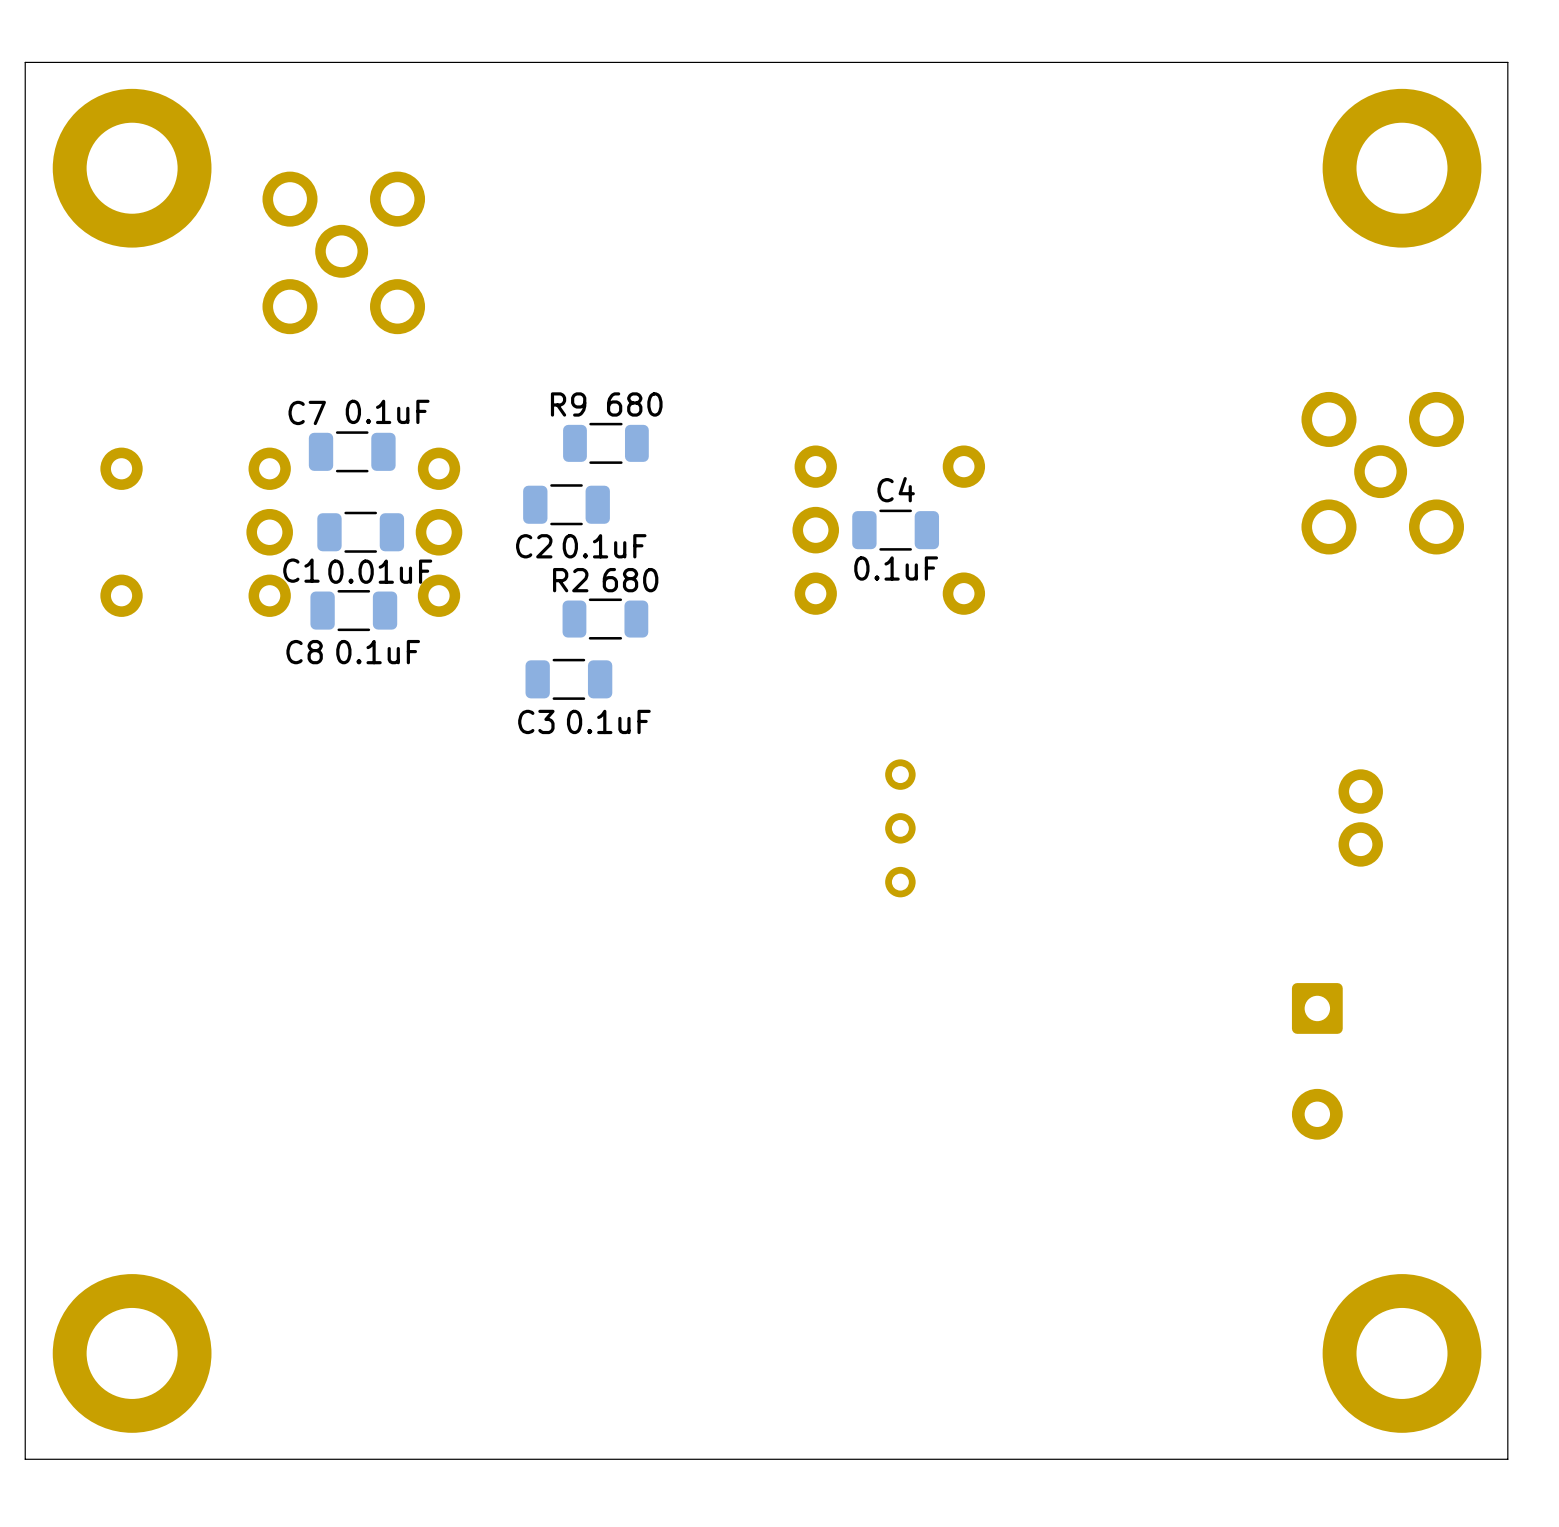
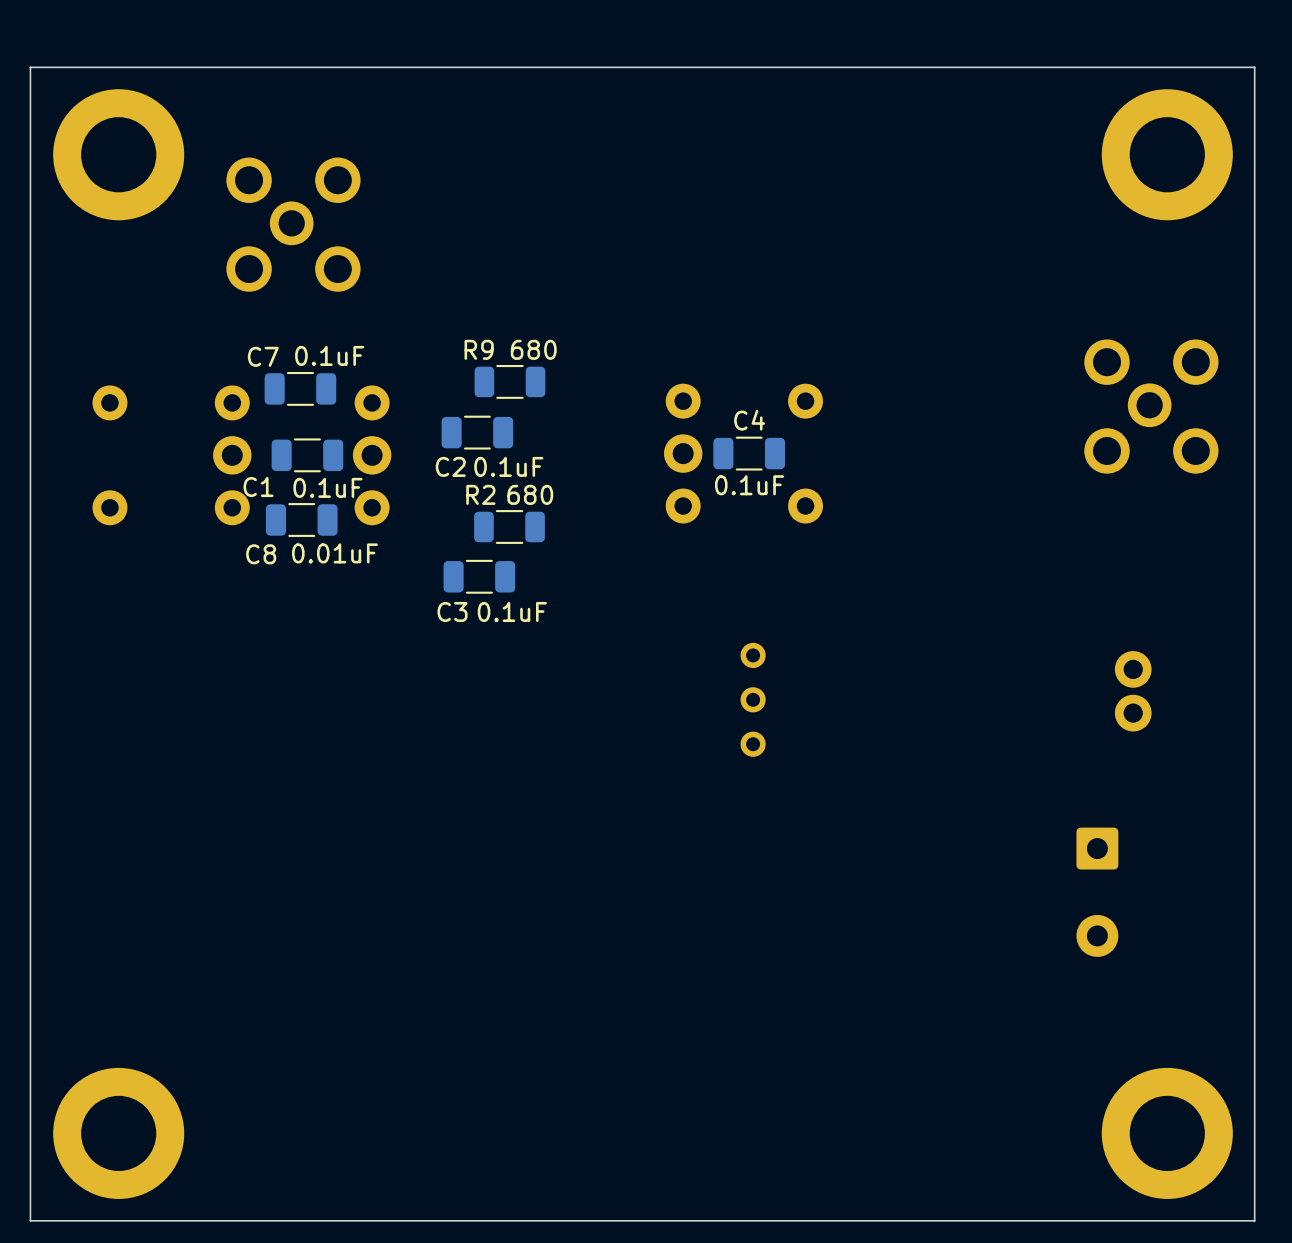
C1 value position: 0.01uF (380, 571) -> 0.01uF (334, 553)
C8 value position: 0.1uF (378, 652) -> 0.1uF (327, 487)

